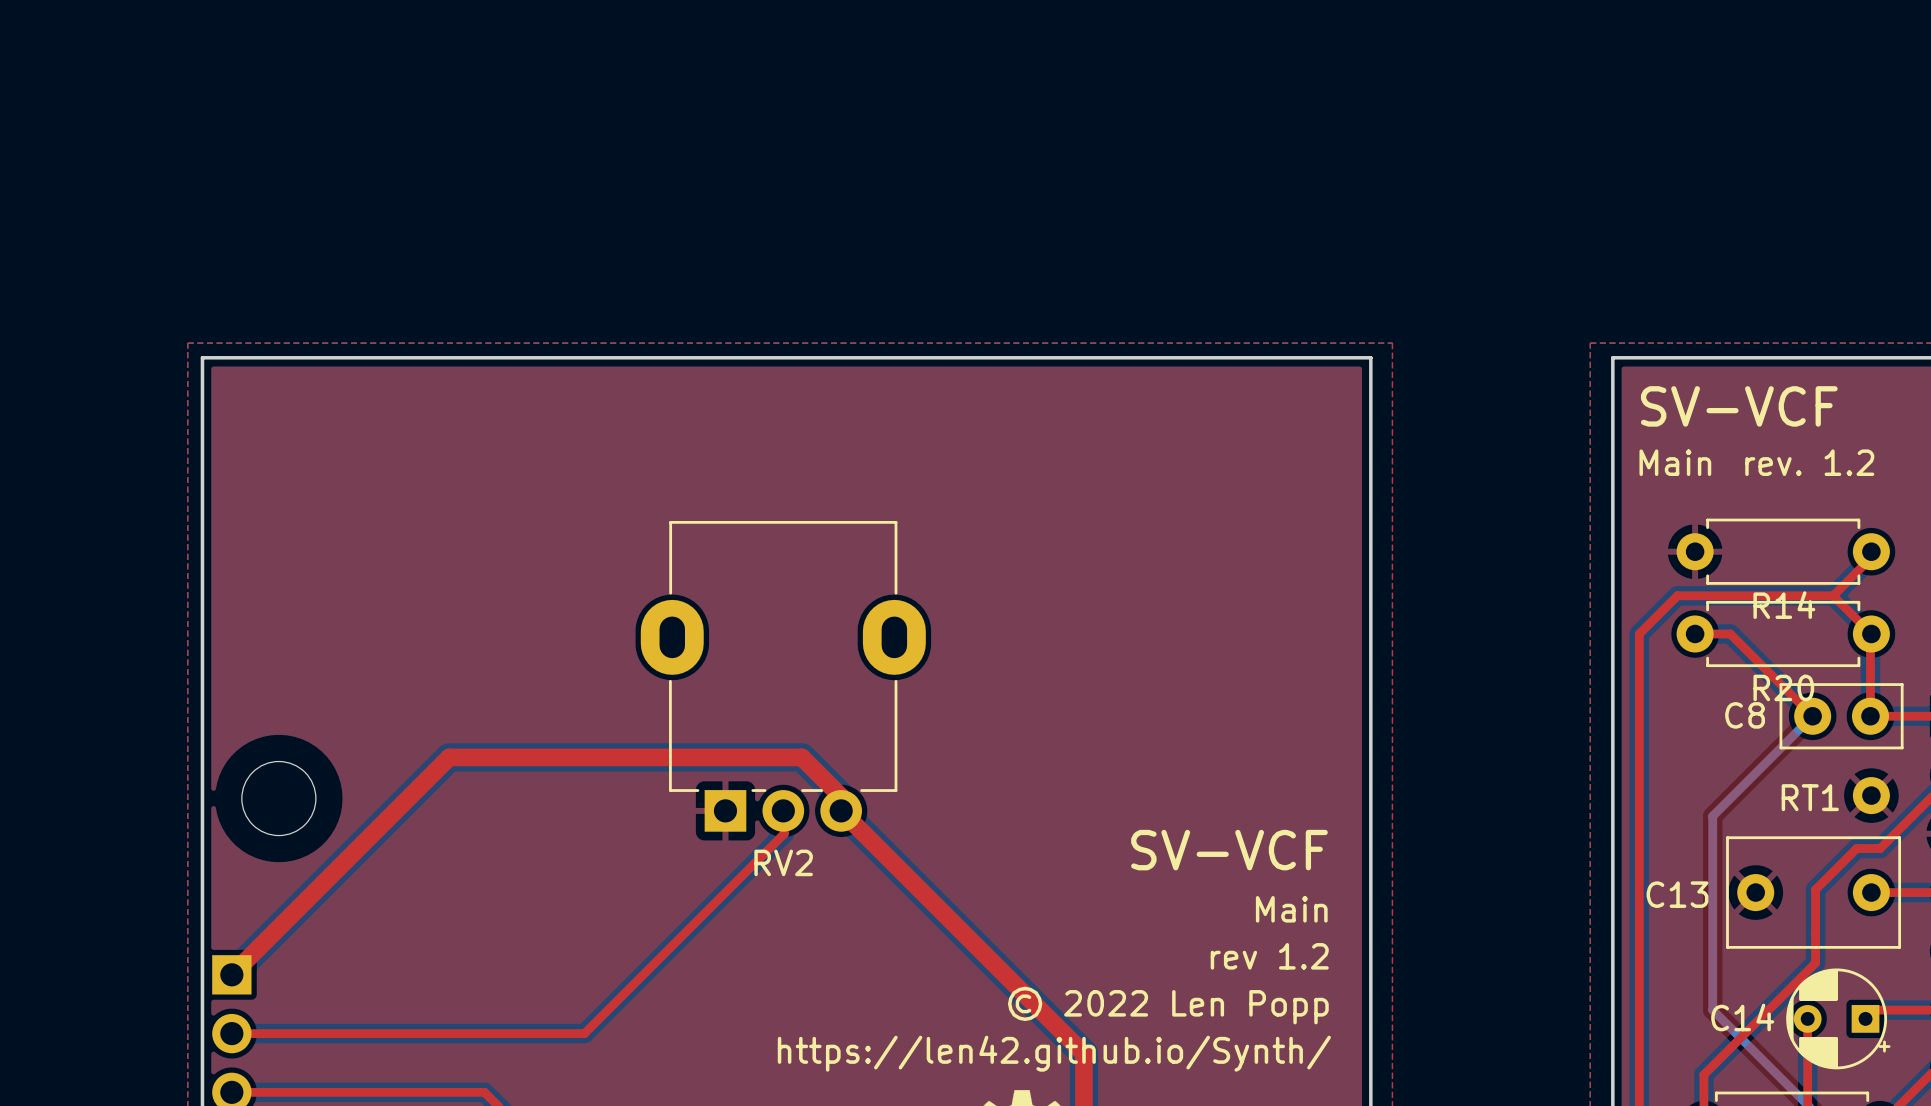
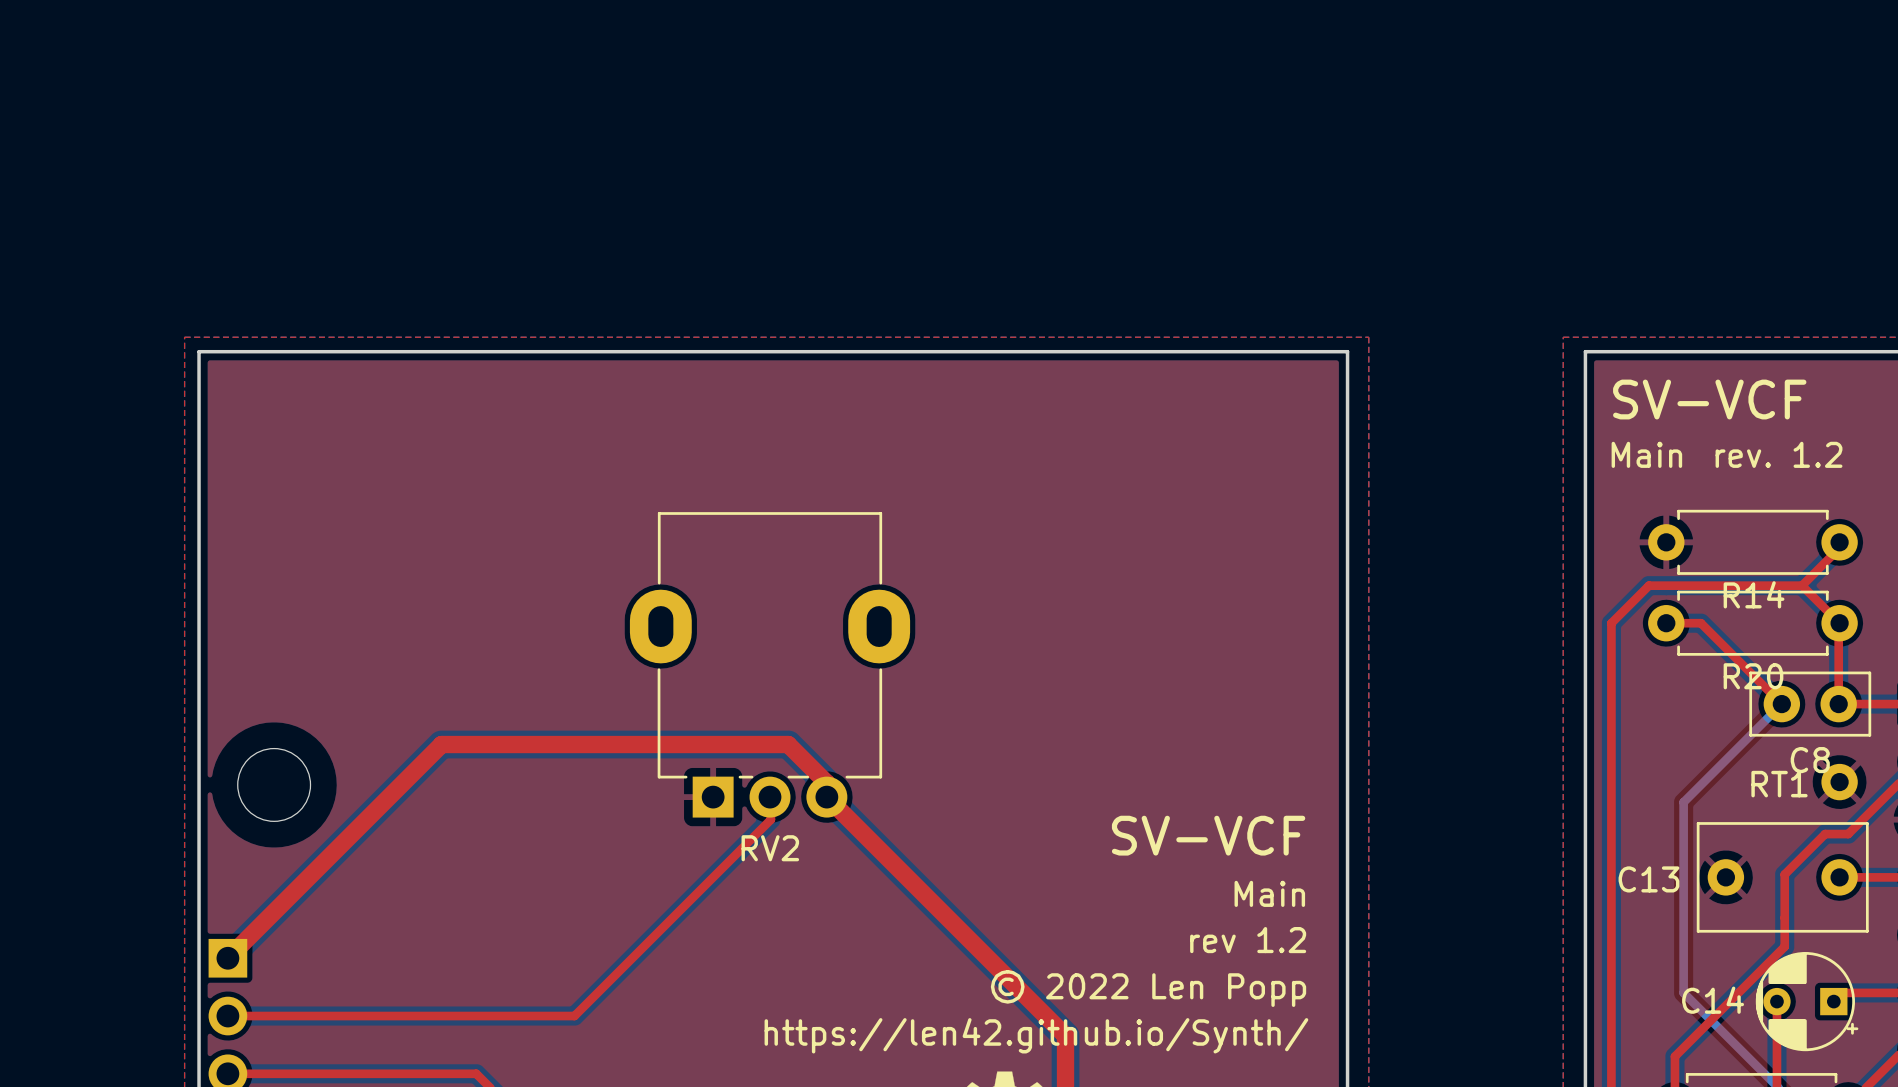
C8 name position: C8 (1745, 715) -> C8 (1810, 760)

